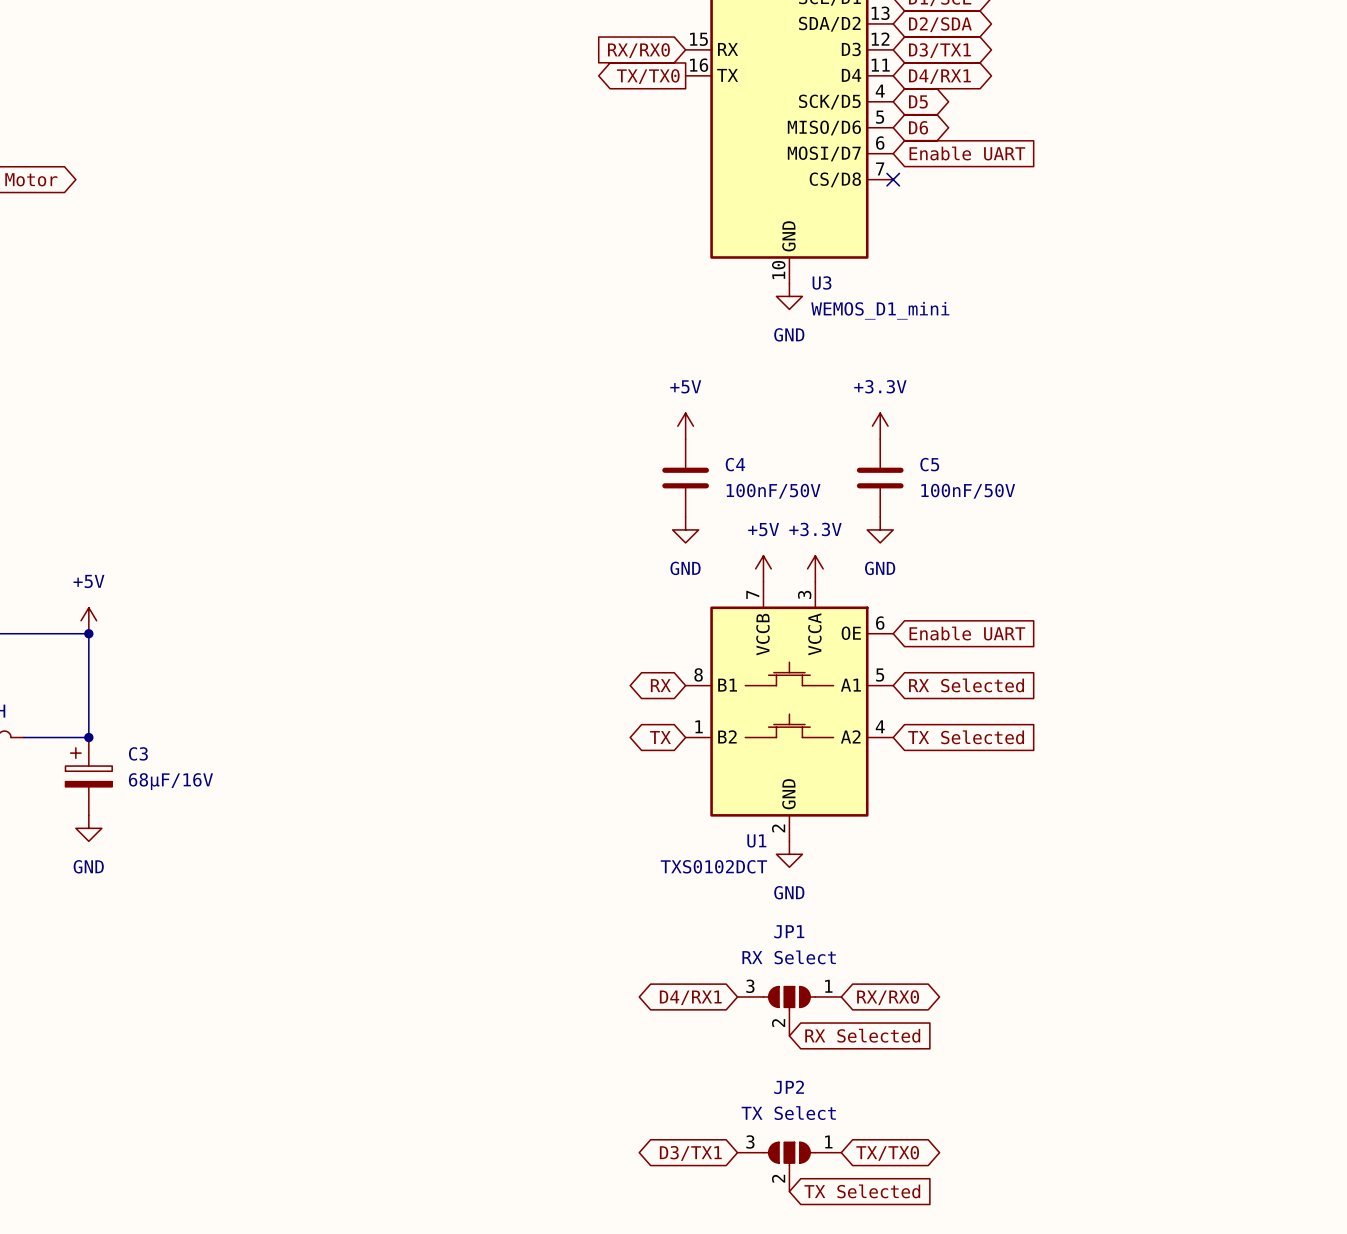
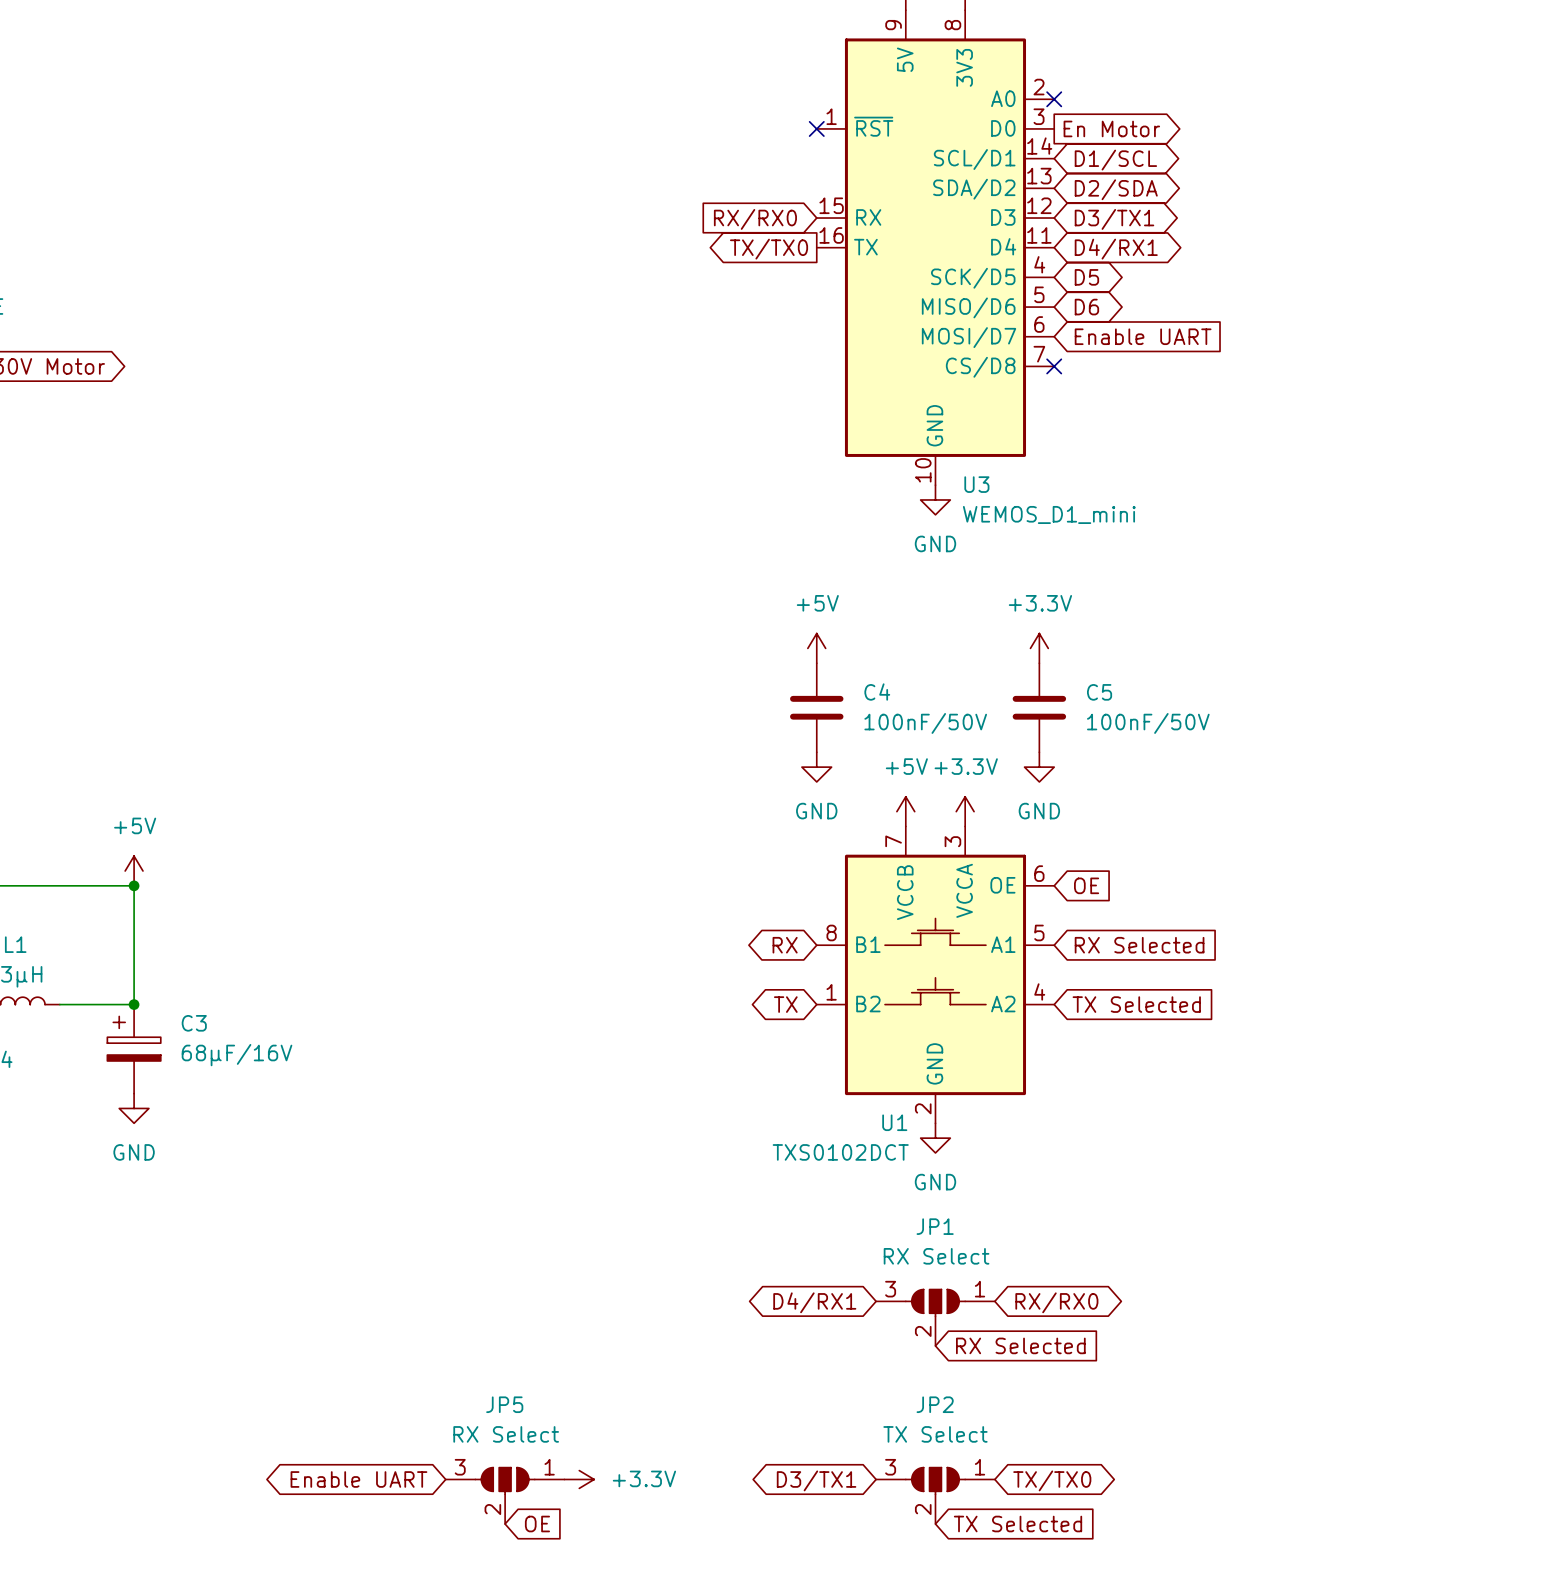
global label: Enable UART (967, 633) -> OE (1086, 885)
global label: none -> Enable UART (358, 1479)
power symbol: none -> +3.3V (579, 1479)
JP5: none -> RX Select (505, 1495)
global label: none -> OE (537, 1524)

